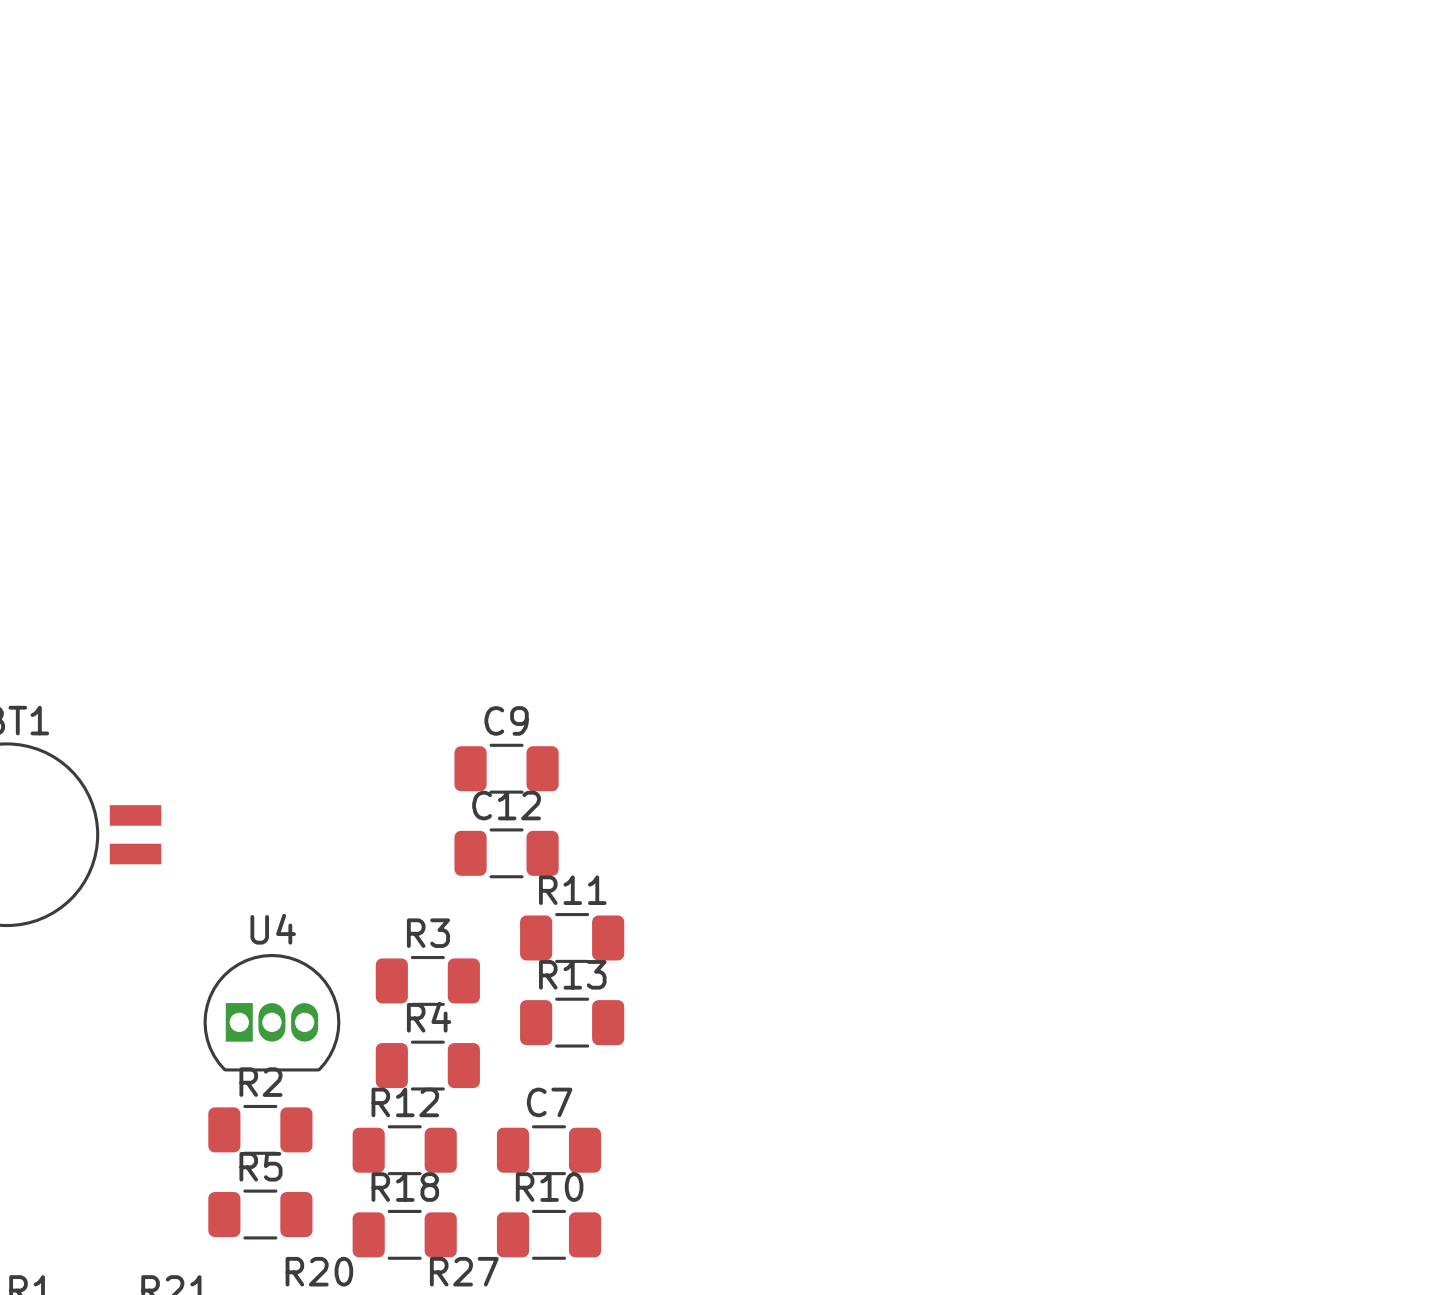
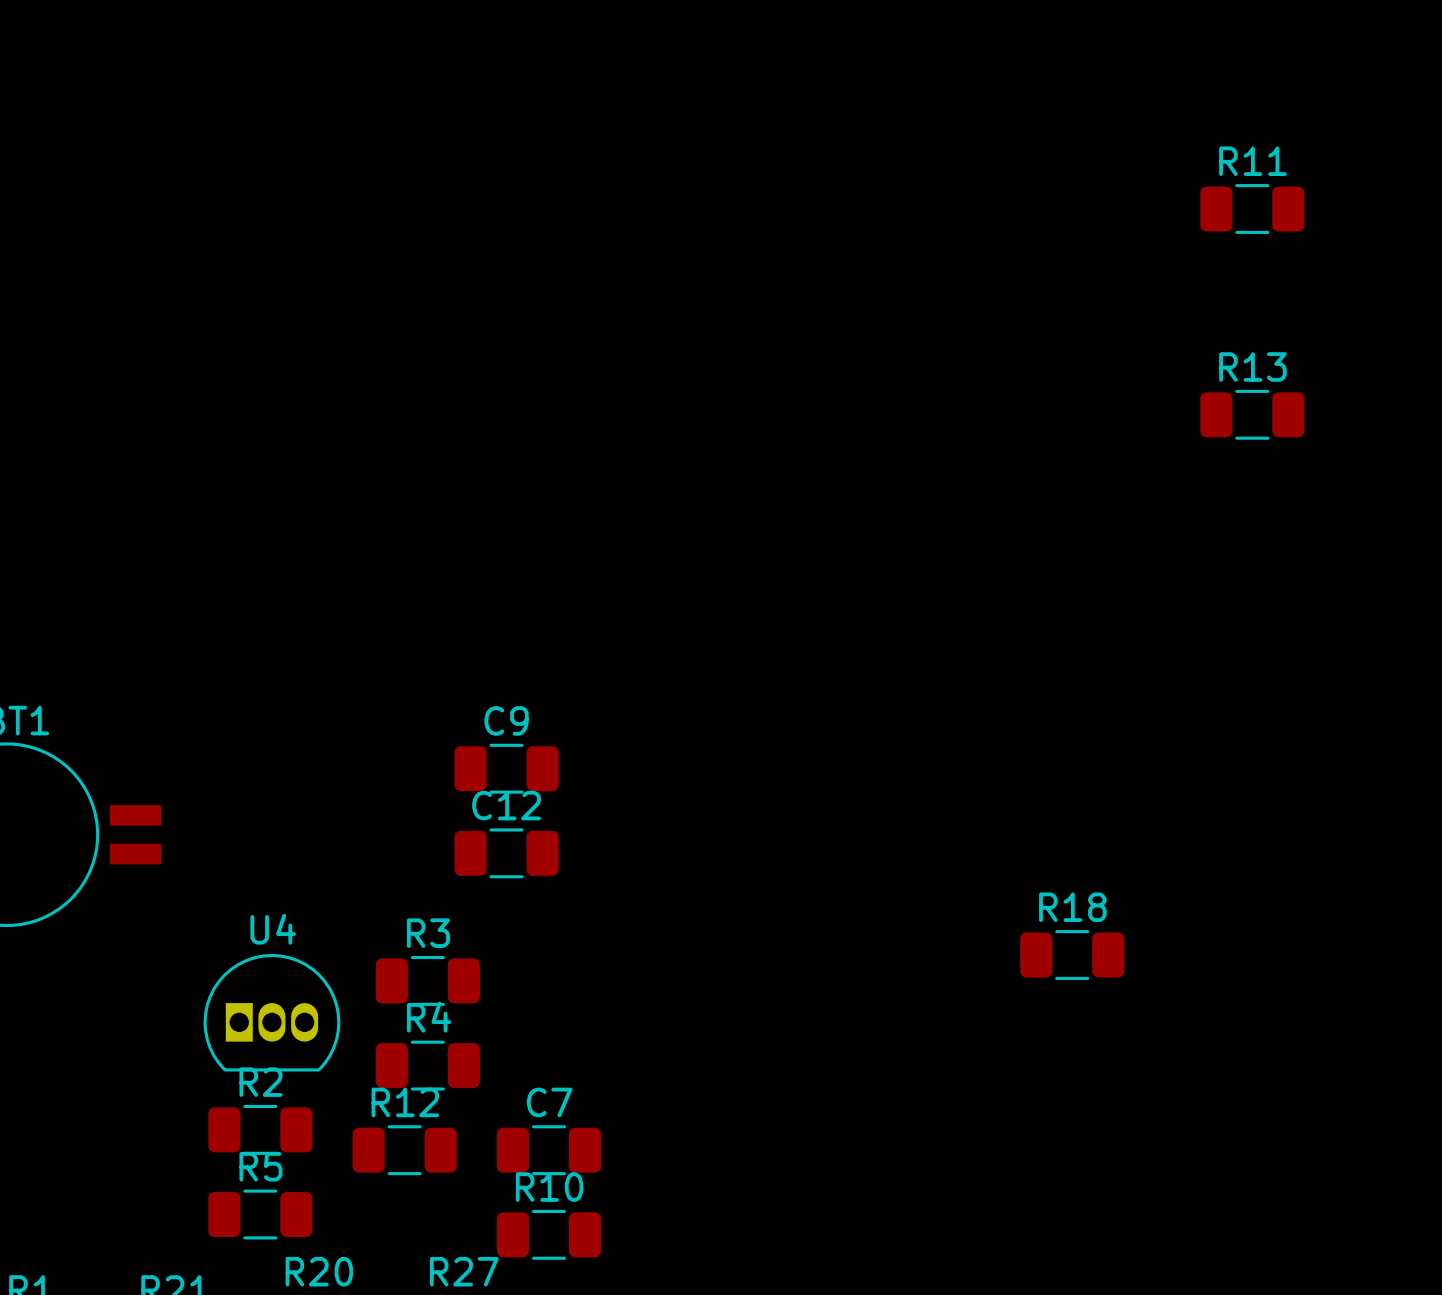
R11 position: (572, 937) -> (1252, 209)
R13 position: (572, 1022) -> (1252, 414)
R18 position: (404, 1234) -> (1072, 955)

